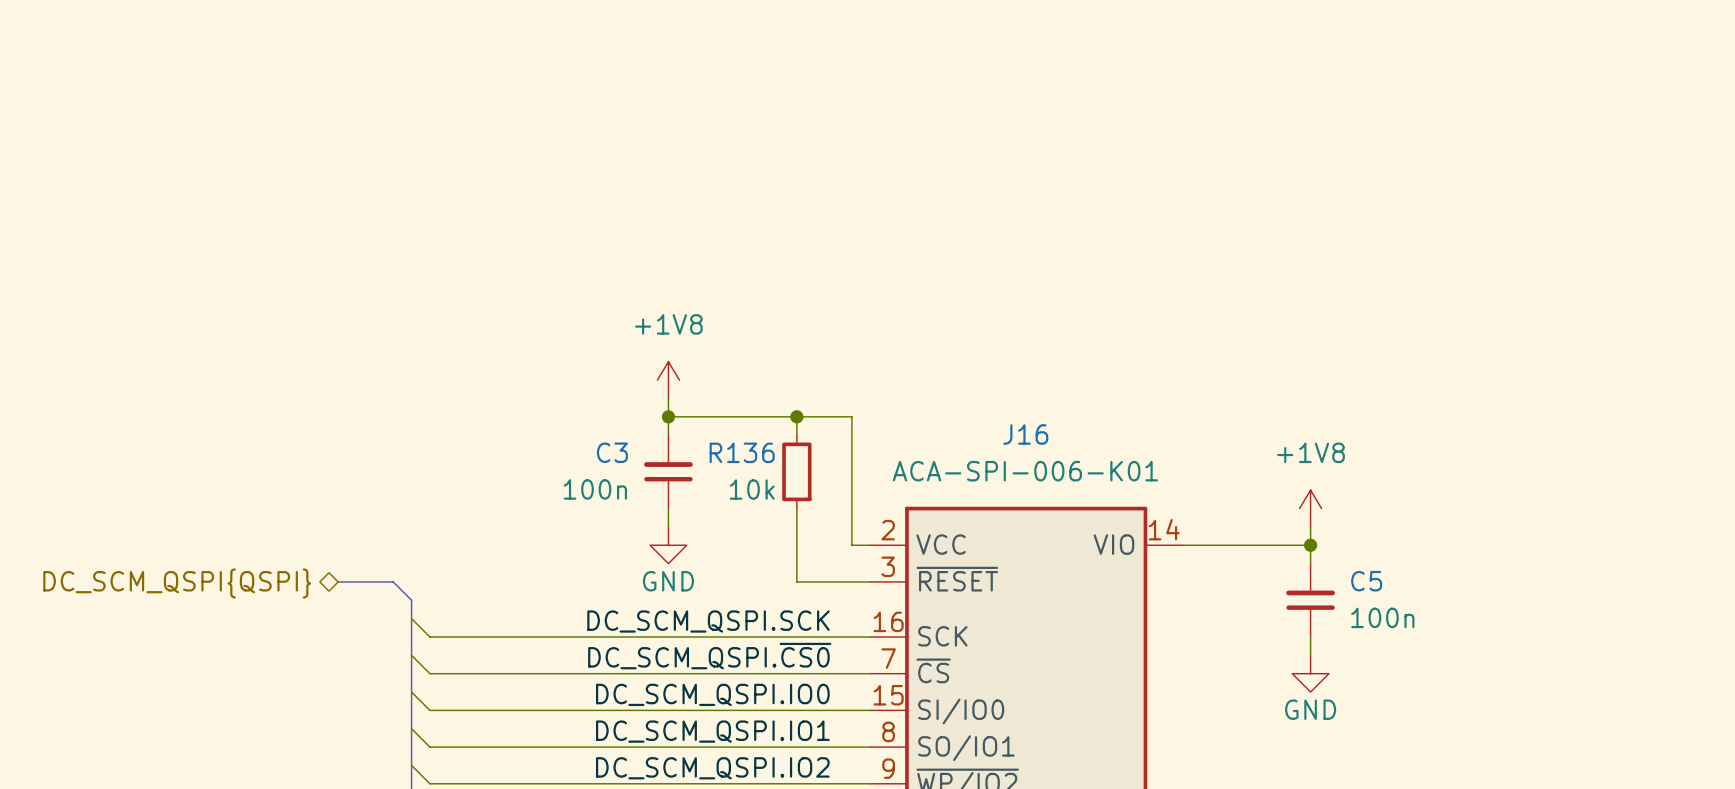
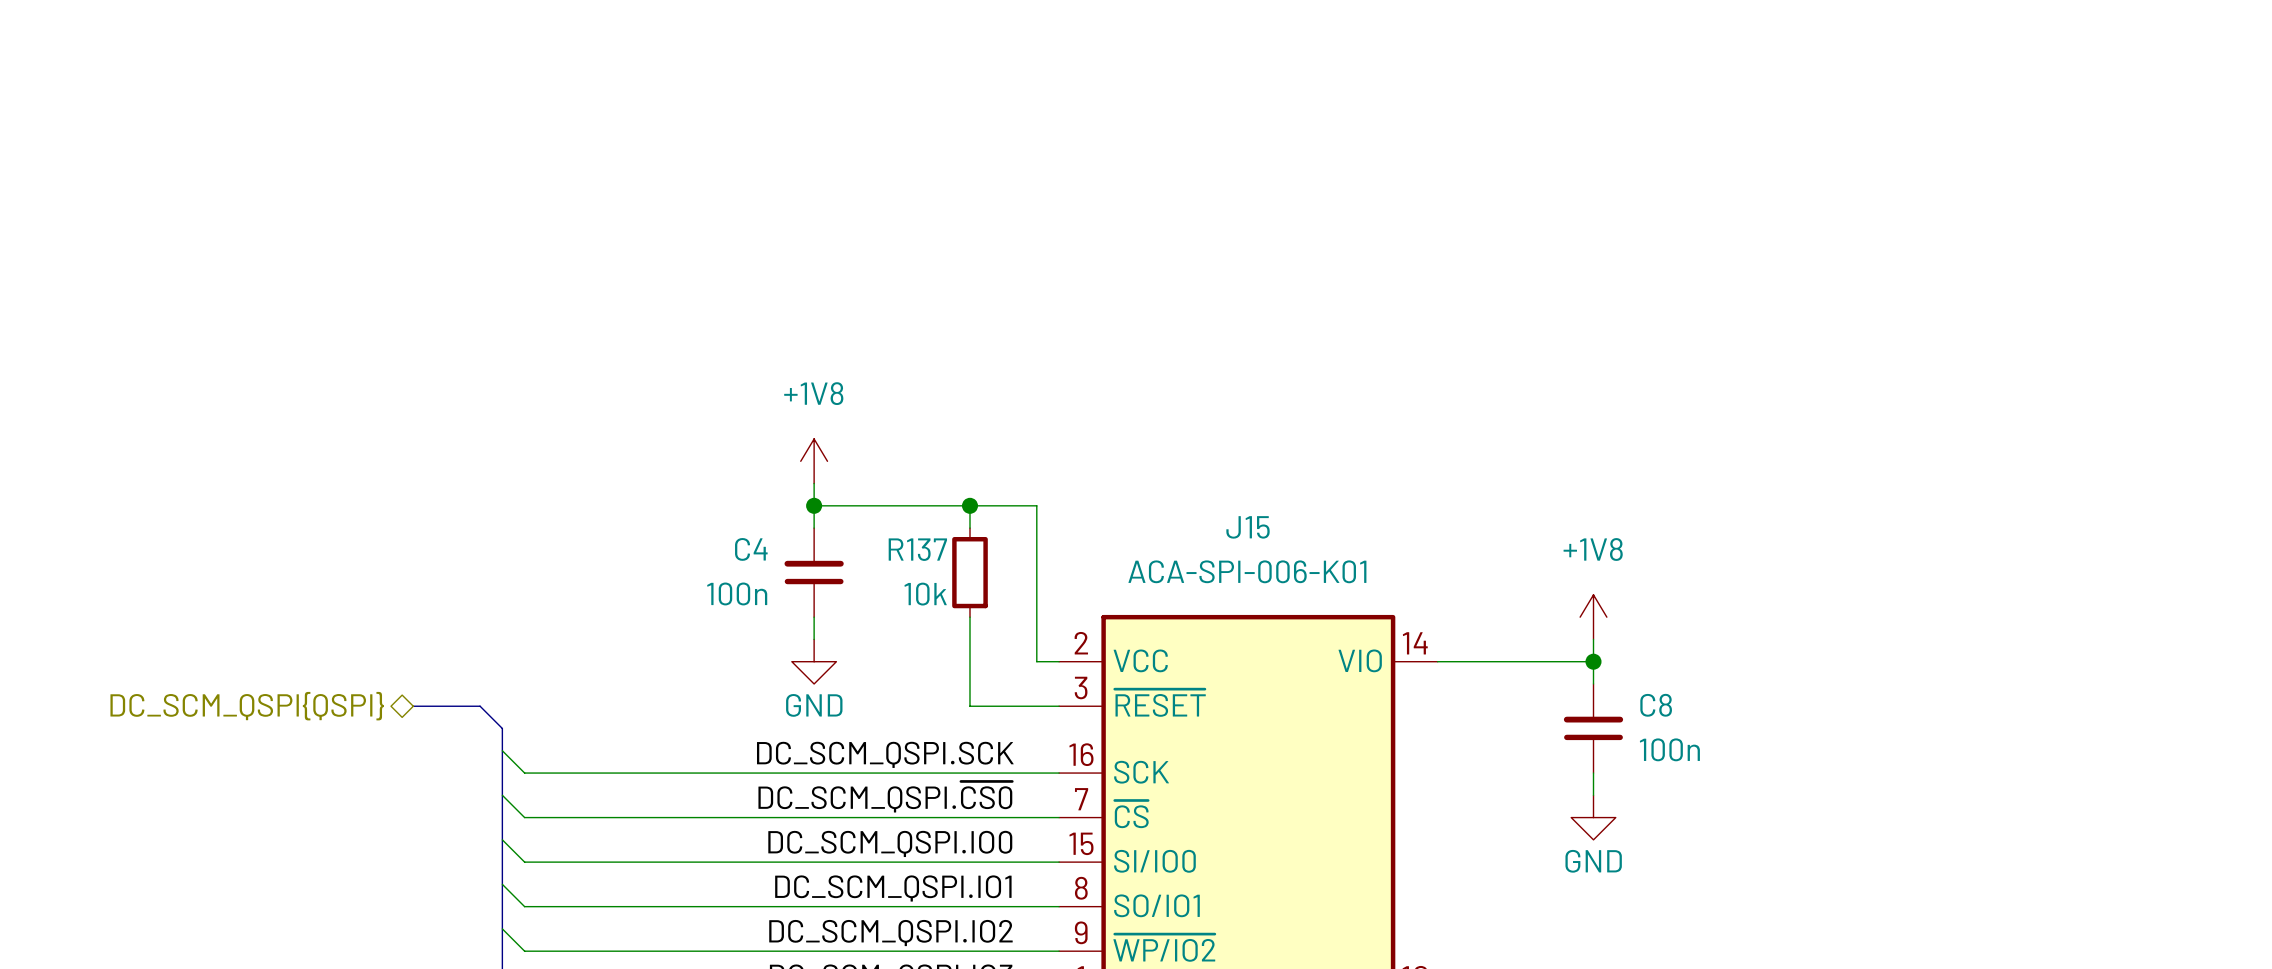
J16 name: J16 (1025, 434) -> J15 (1248, 527)
C3 name: C3 (612, 452) -> C4 (751, 549)
R136 name: R136 (742, 452) -> R137 (917, 549)
C5 name: C5 (1366, 581) -> C8 (1656, 705)

